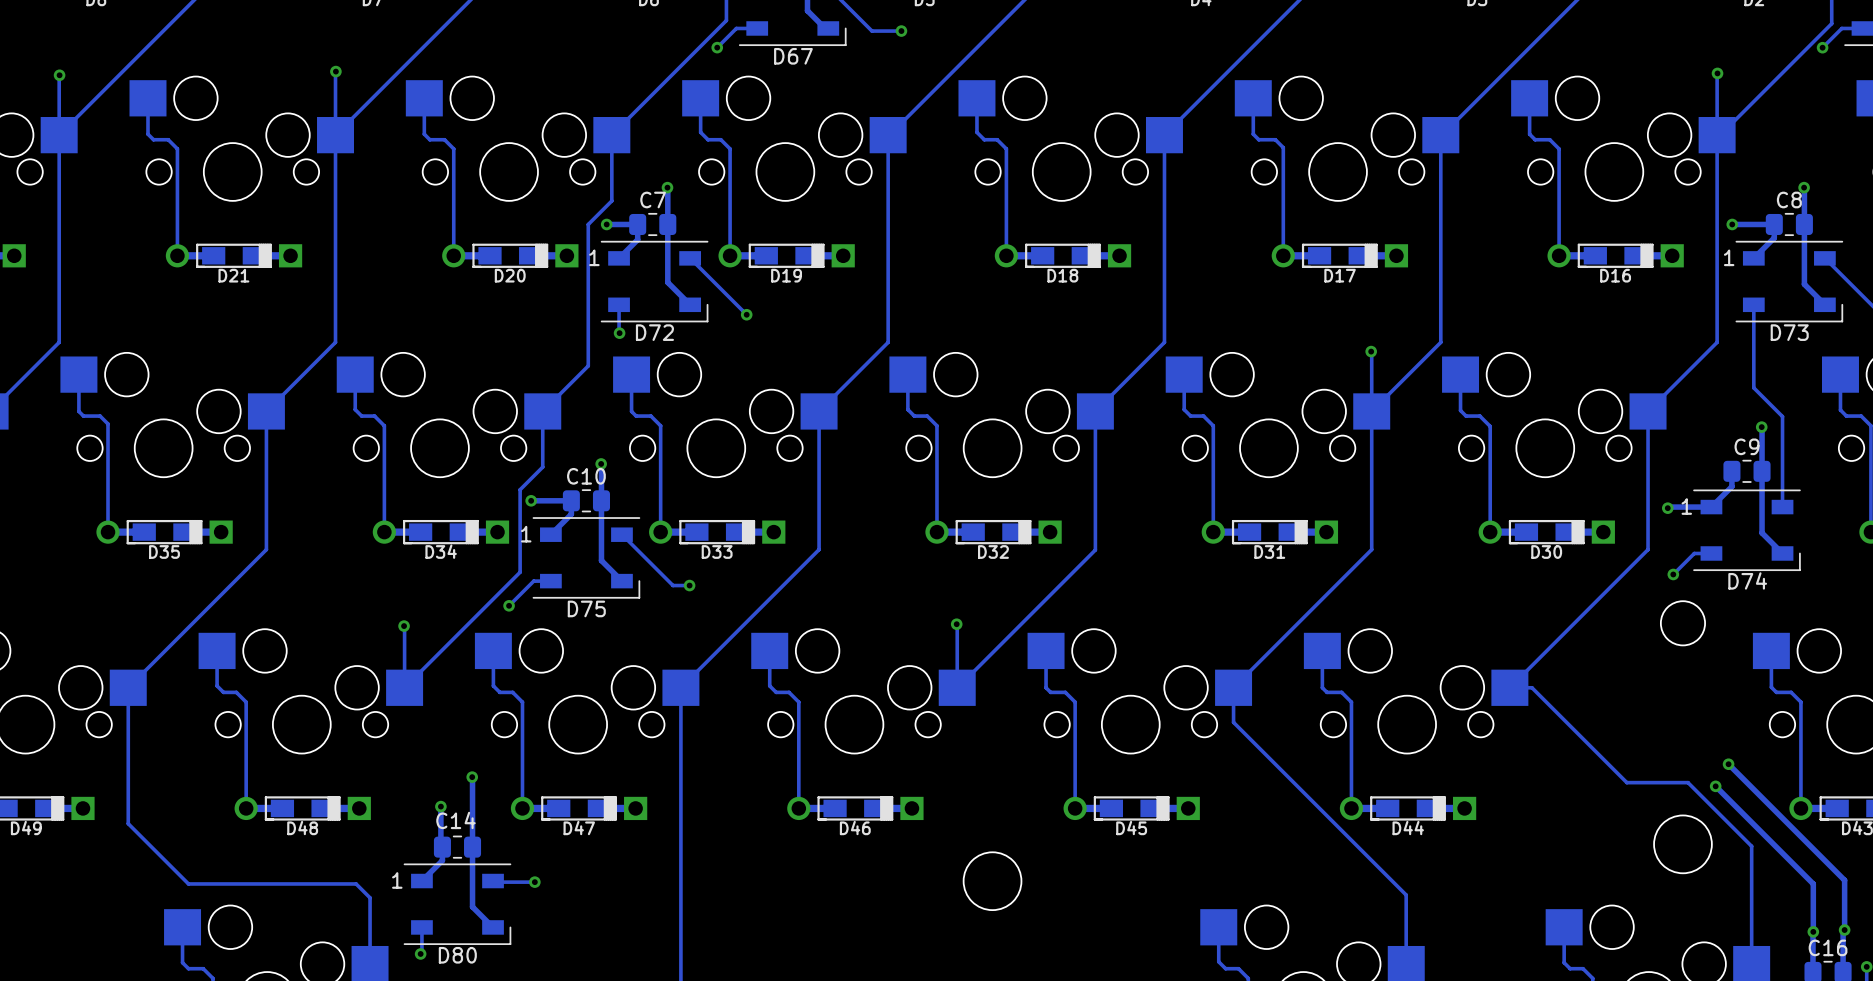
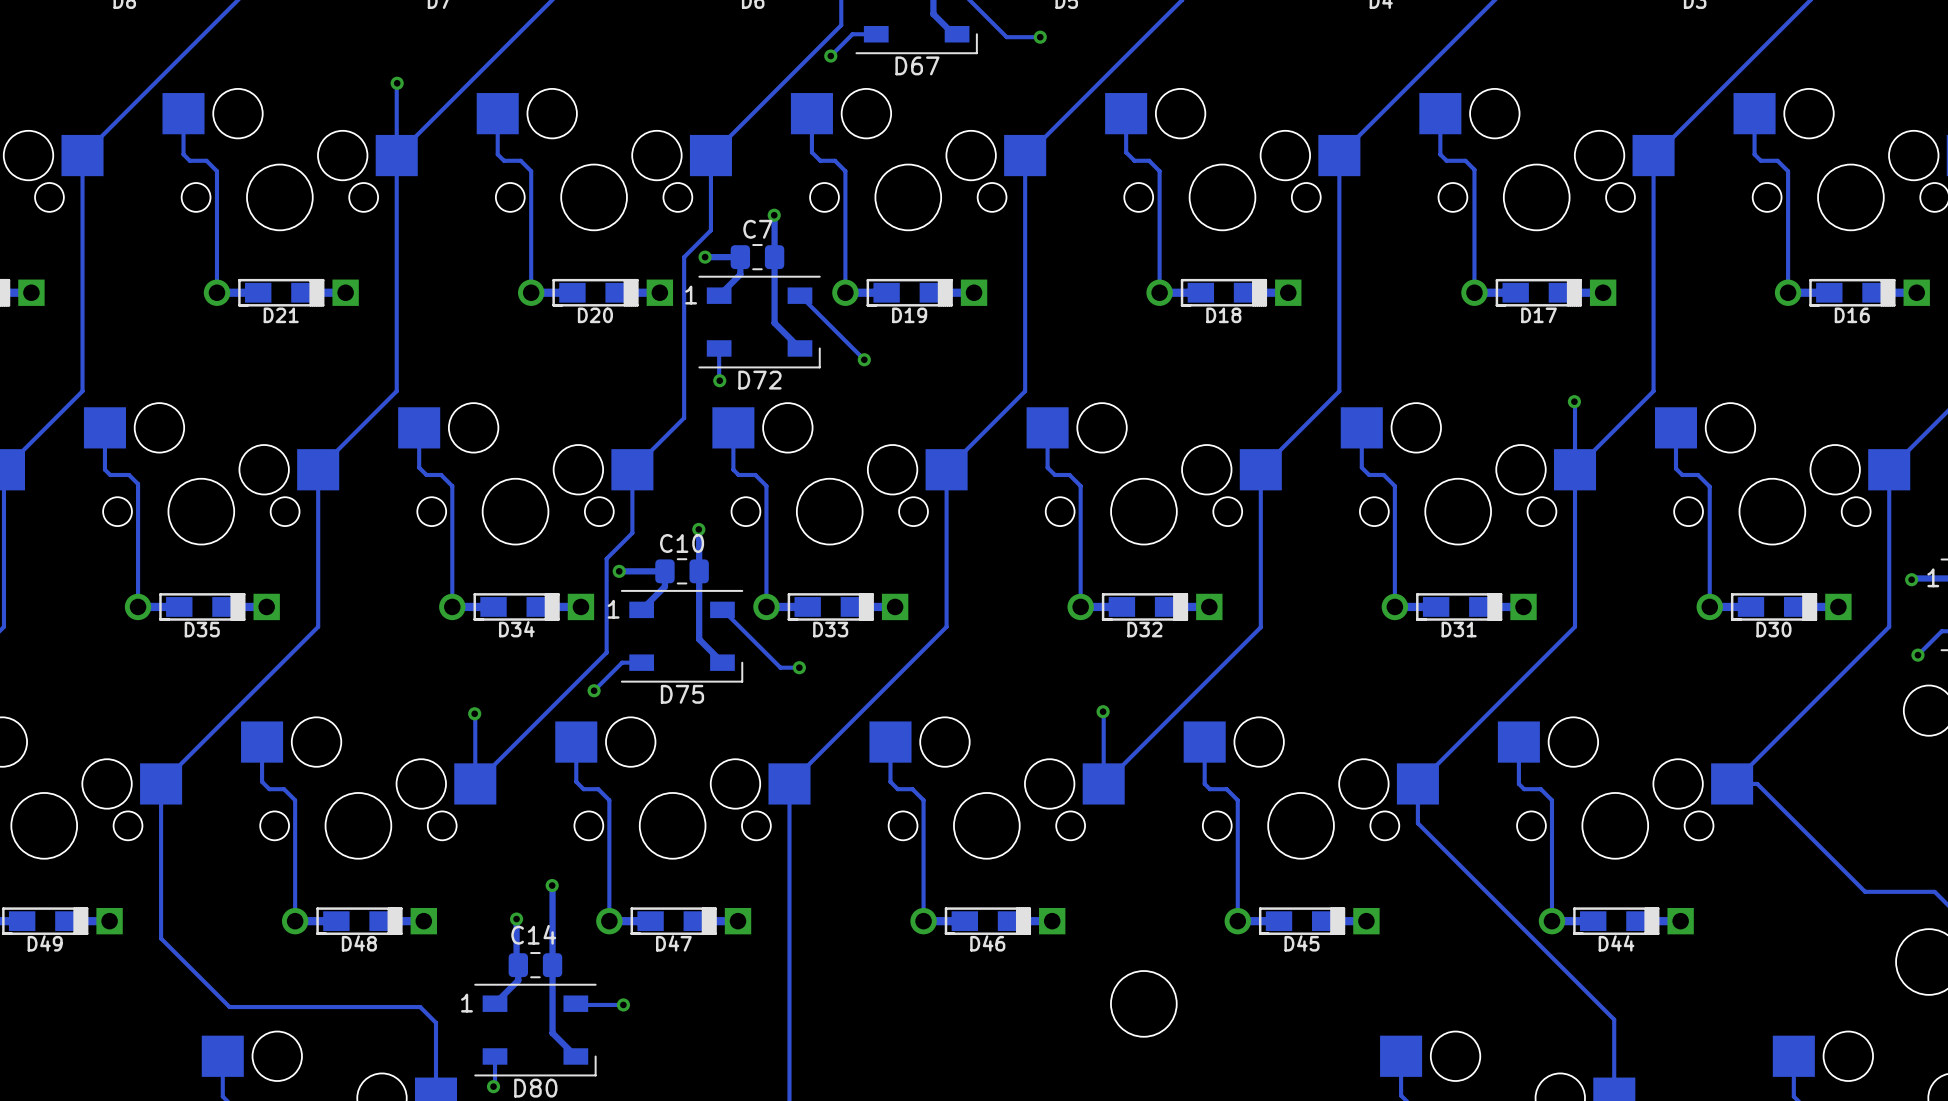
track: (59, 75) (59, 135) -> none
via: (59, 75) -> none

